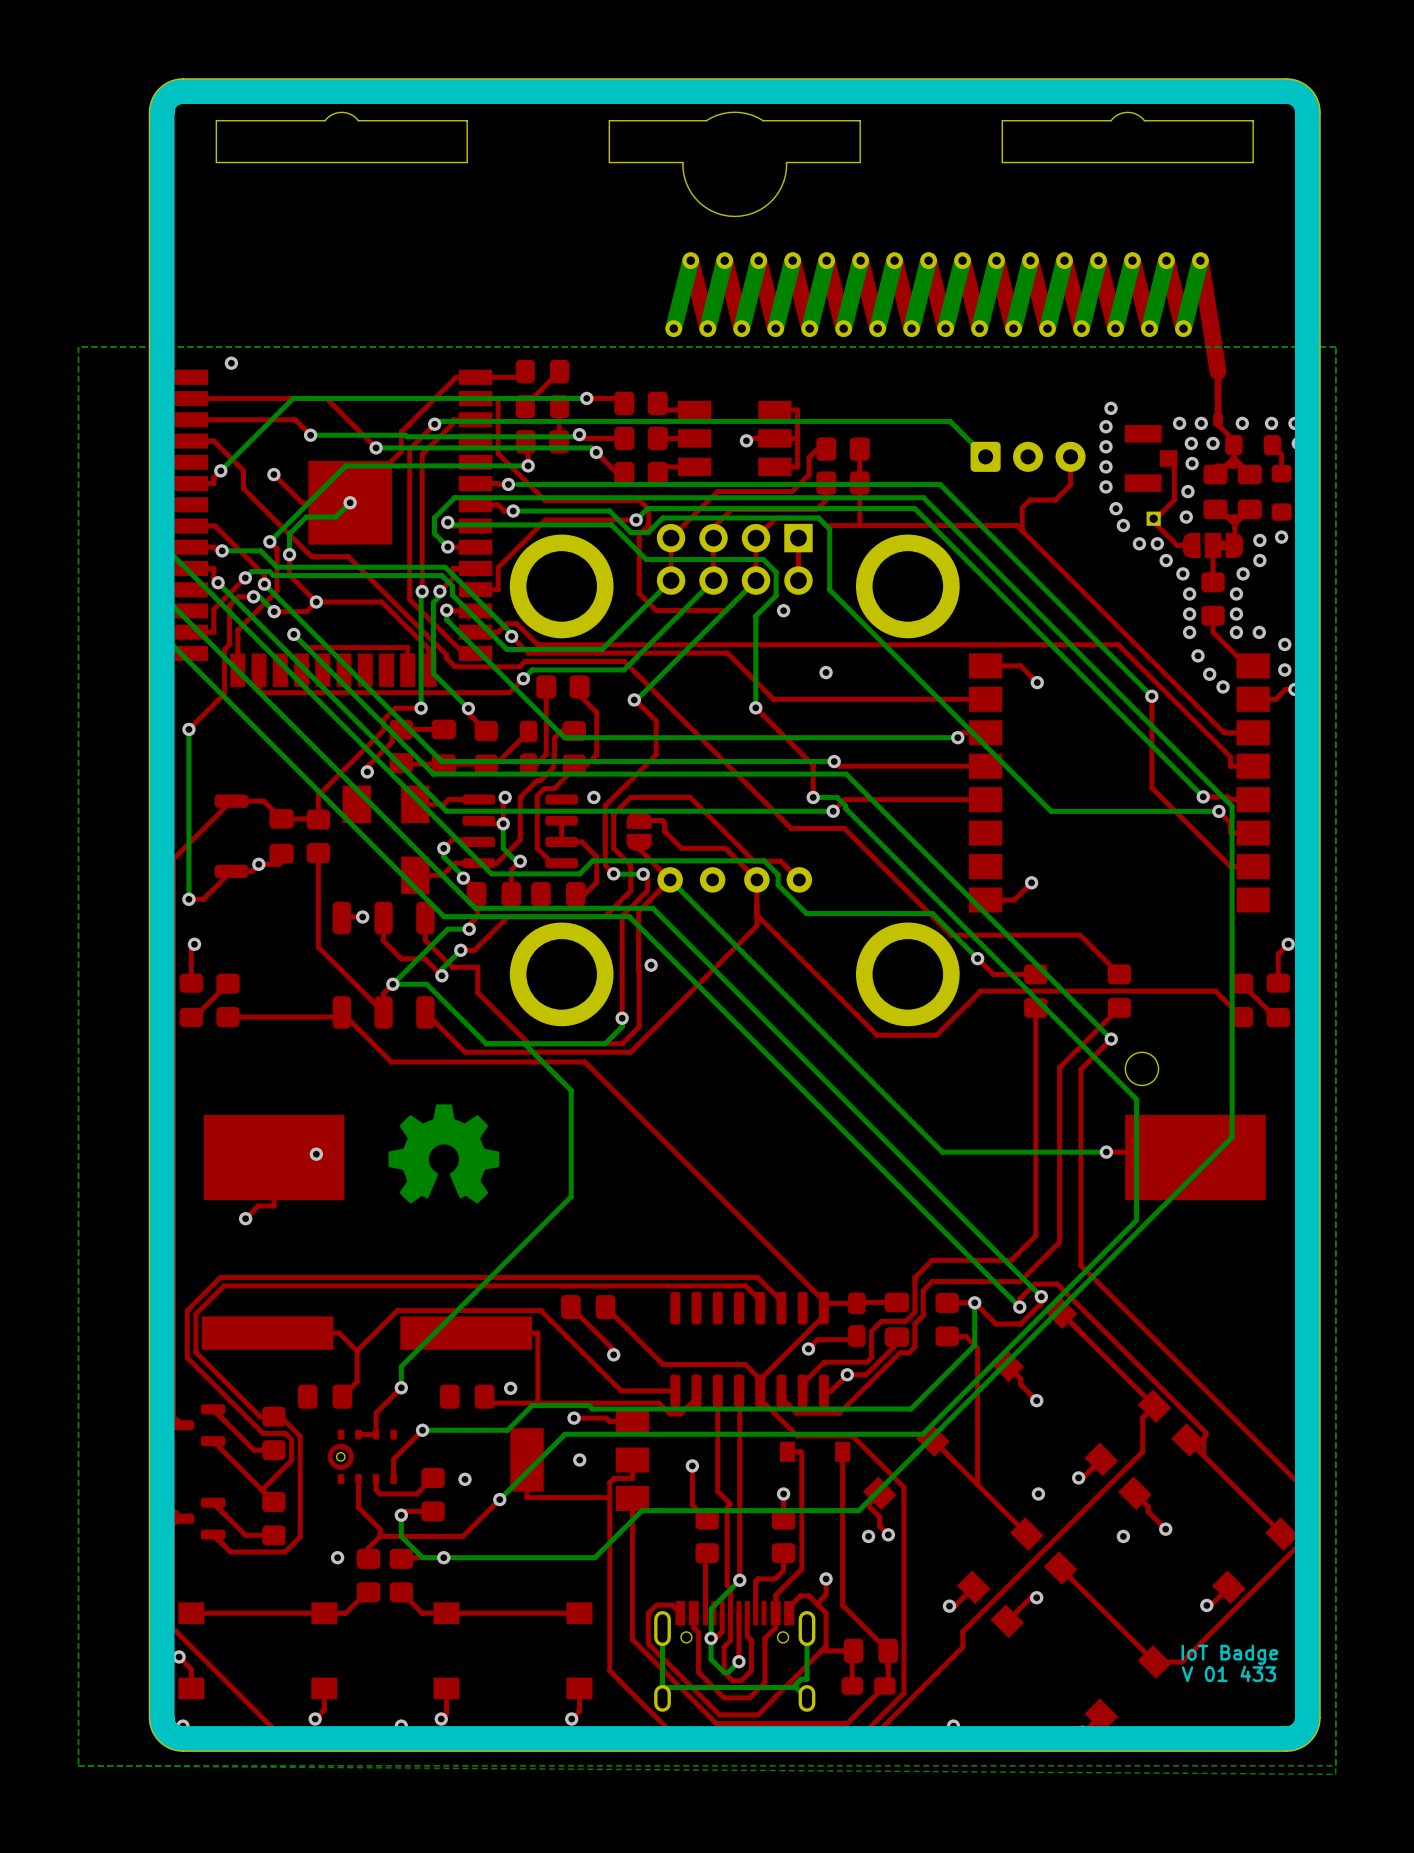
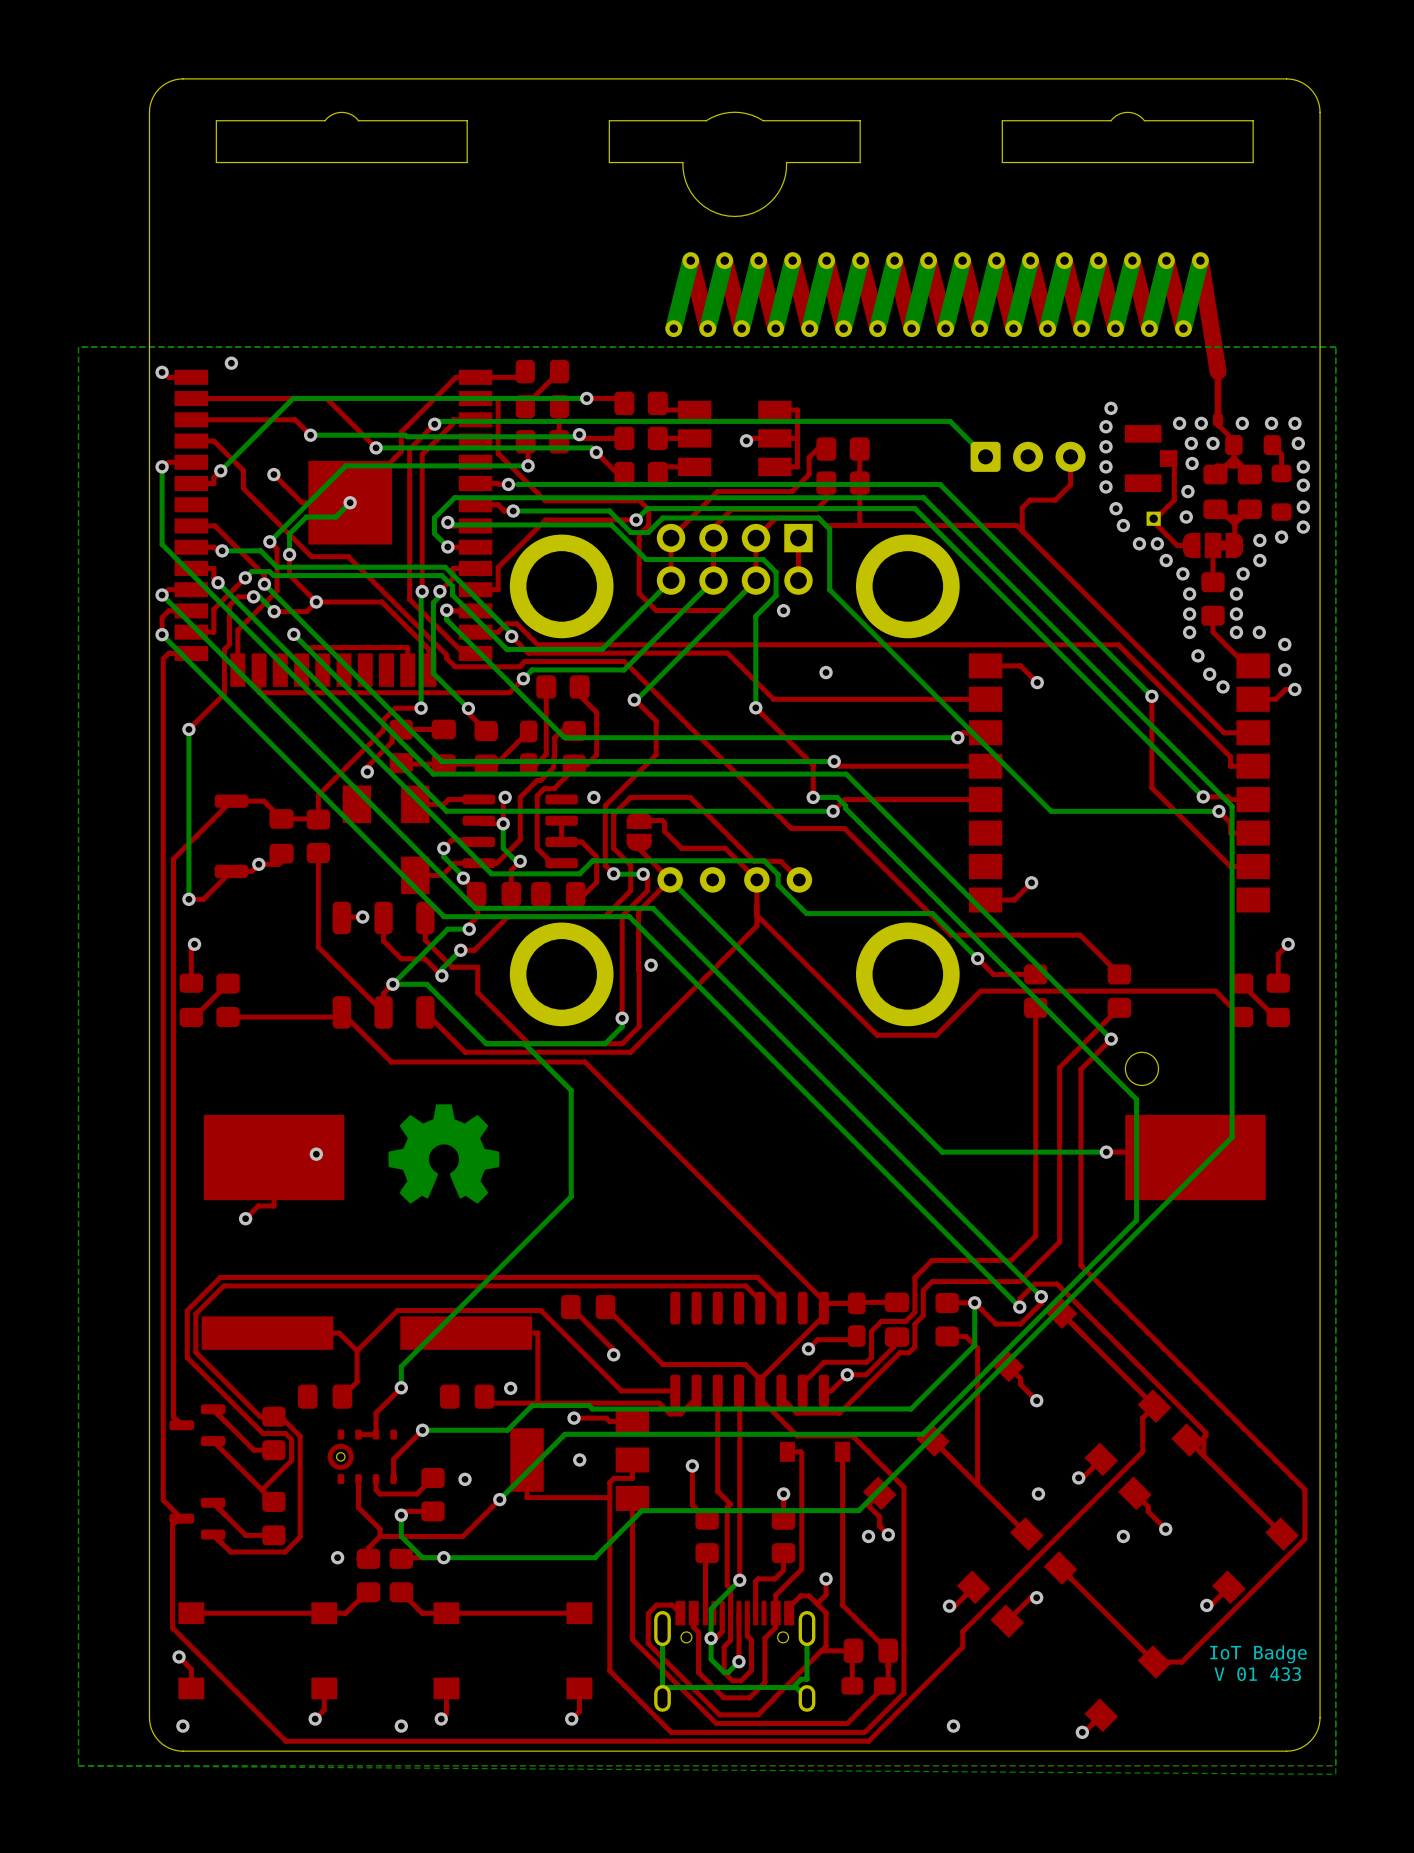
line: (1286, 91) (182, 91) (172, 94) (166, 99) (162, 112) (162, 1717) (163, 1725) (170, 1734) (182, 1738) (1286, 1738) (1294, 1737) (1303, 1730) (1307, 1717) (1307, 112) (1305, 104) (1301, 97) (1294, 93) (1286, 91) -> none
text position: IoT Badge (1229, 1654) -> IoT Badge (1258, 1654)
text position: V 01 433 (1228, 1673) -> V 01 433 (1257, 1674)

